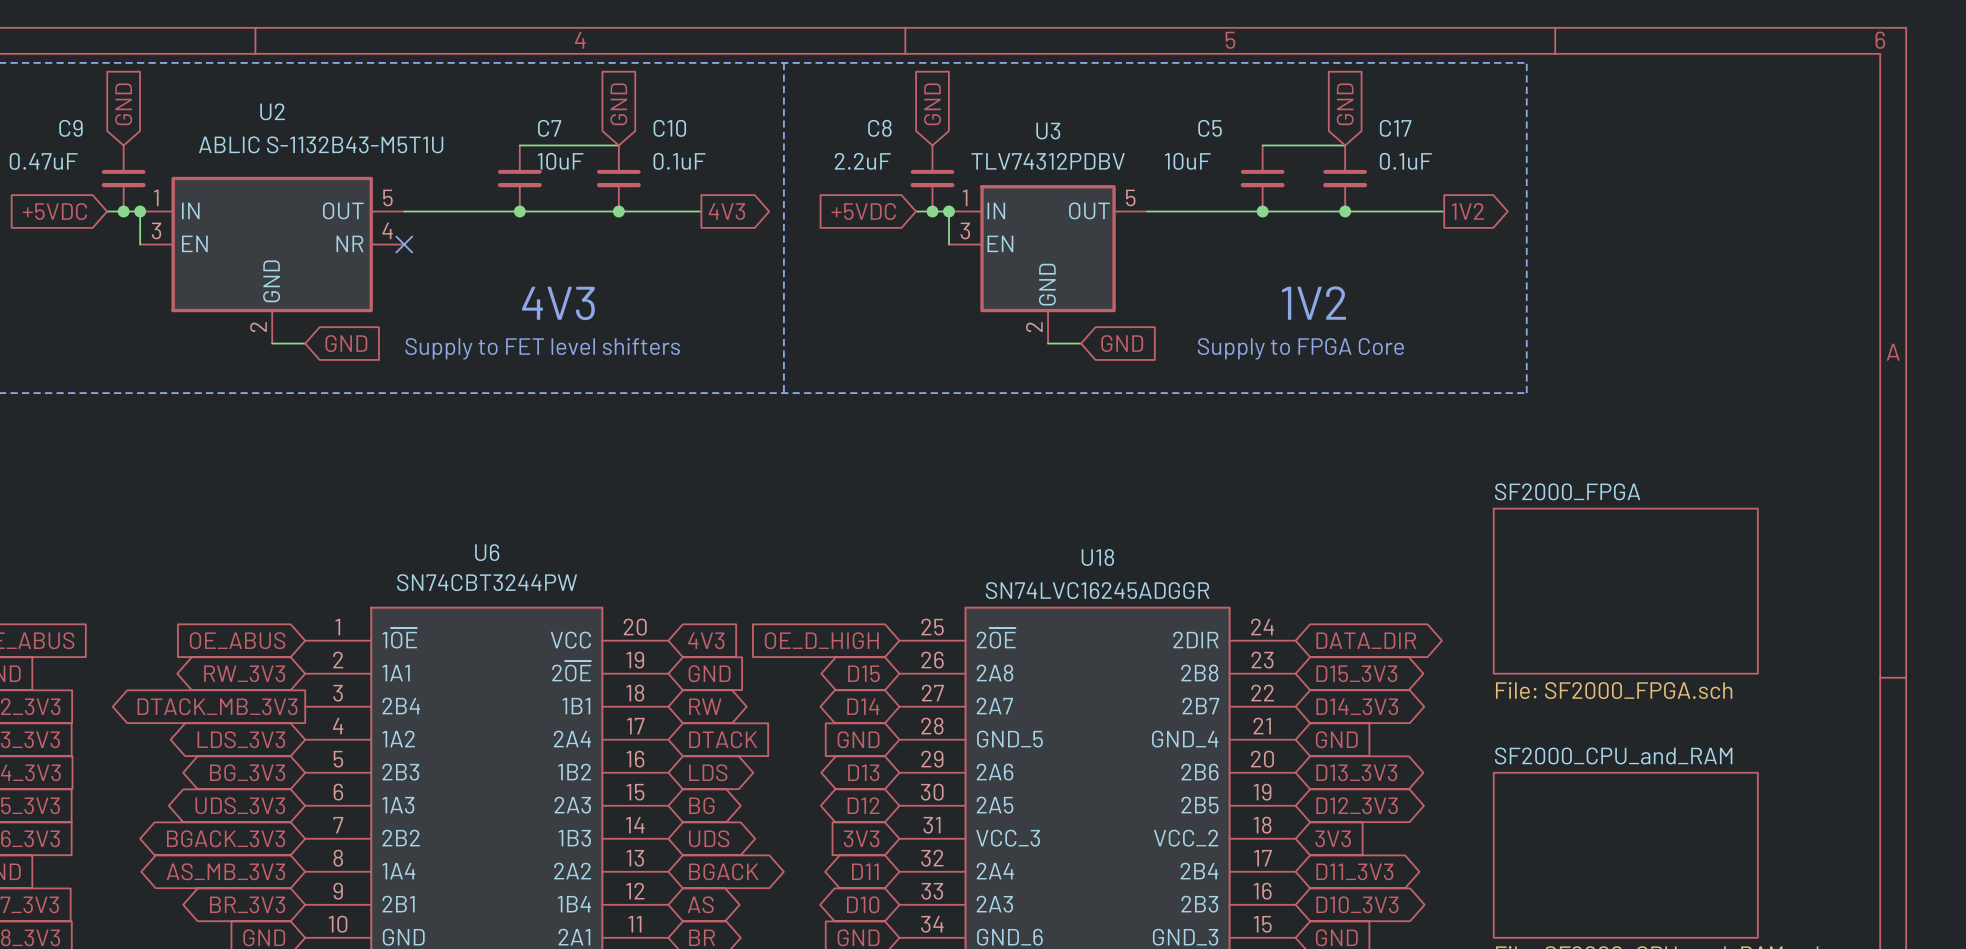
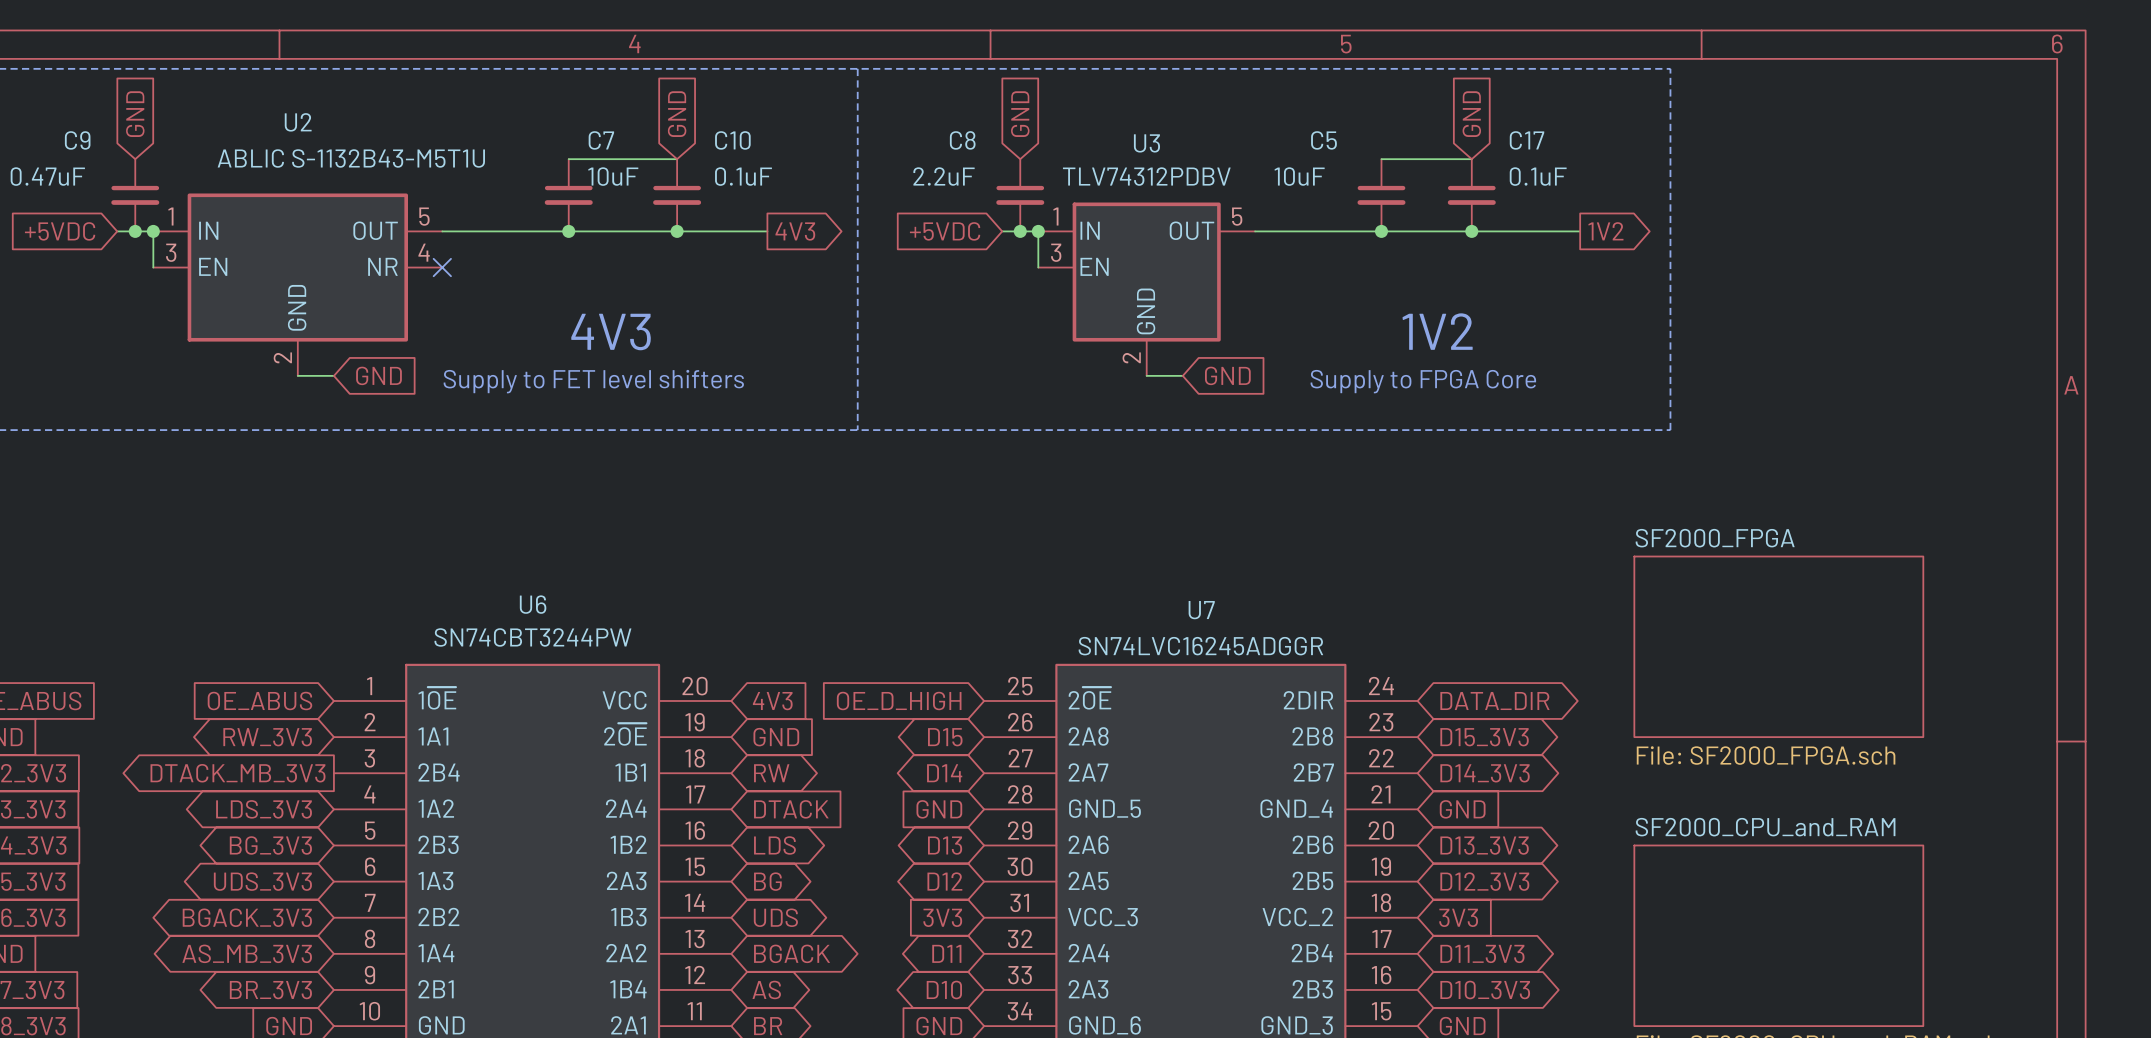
U18 name: U18 (1097, 557) -> U7 (1201, 610)

